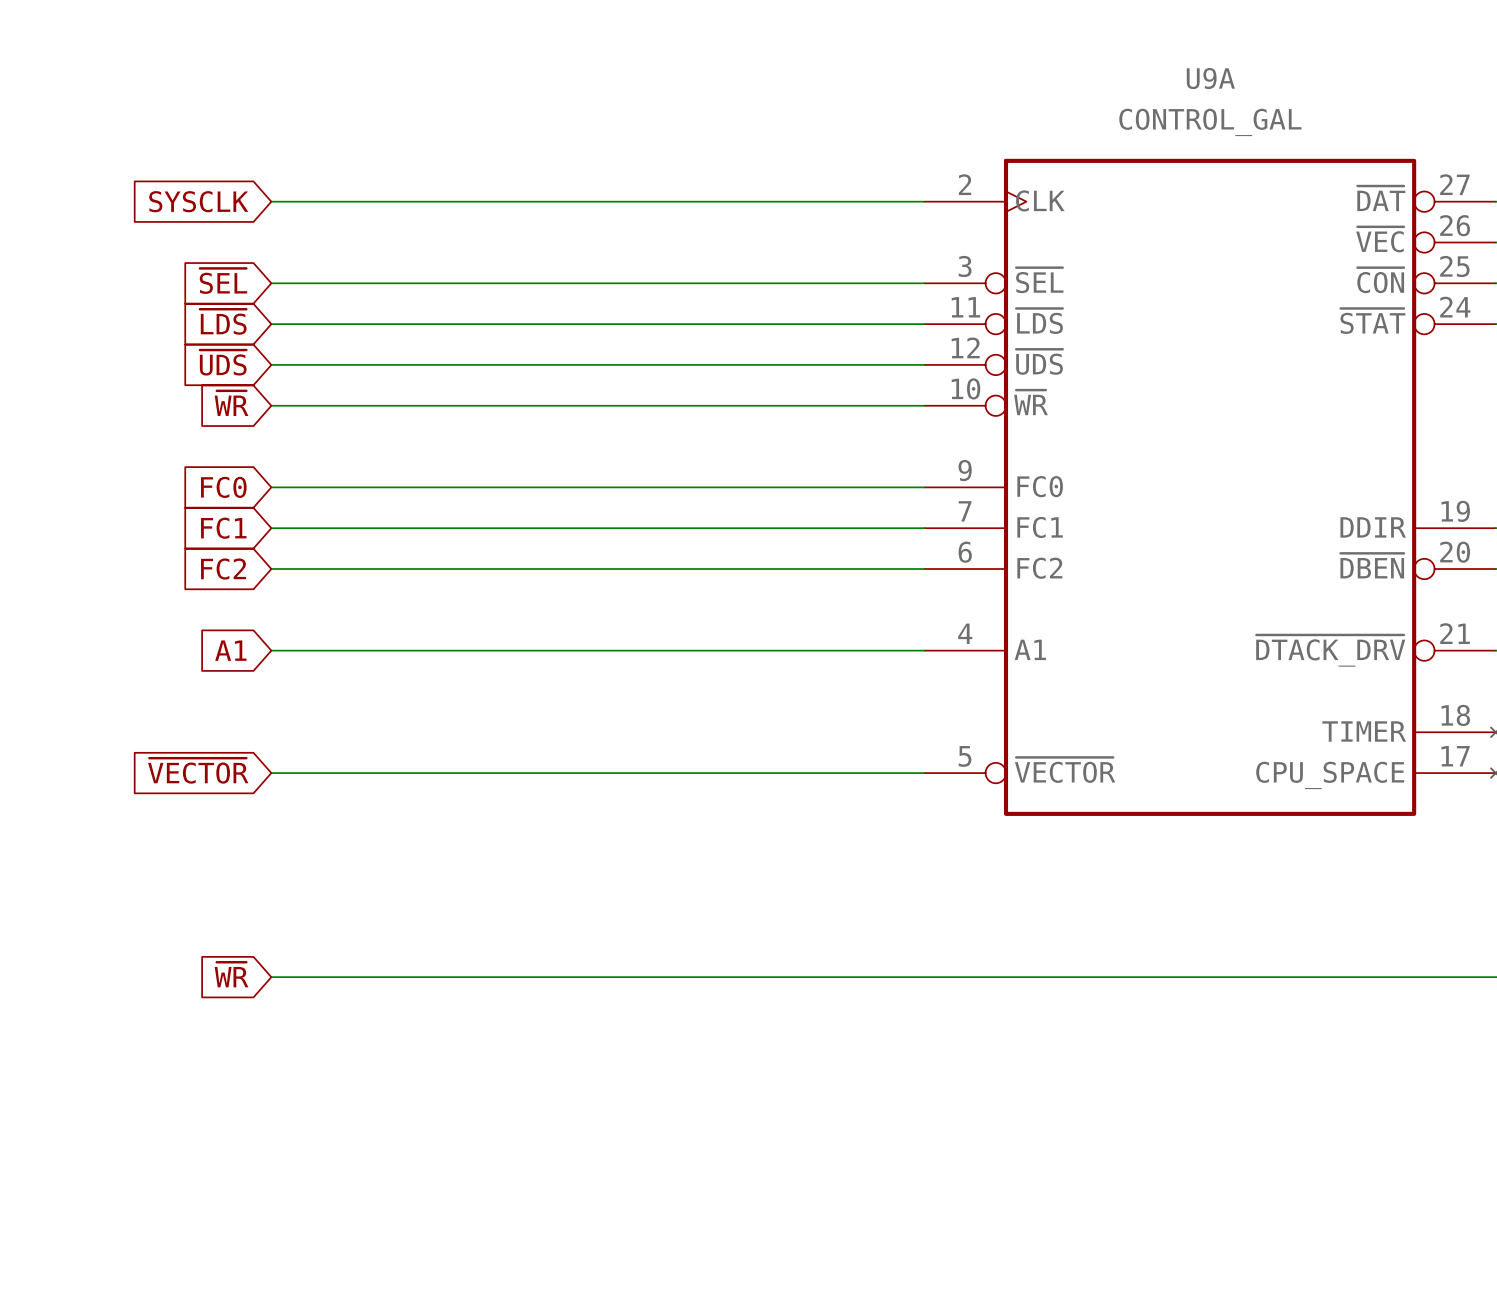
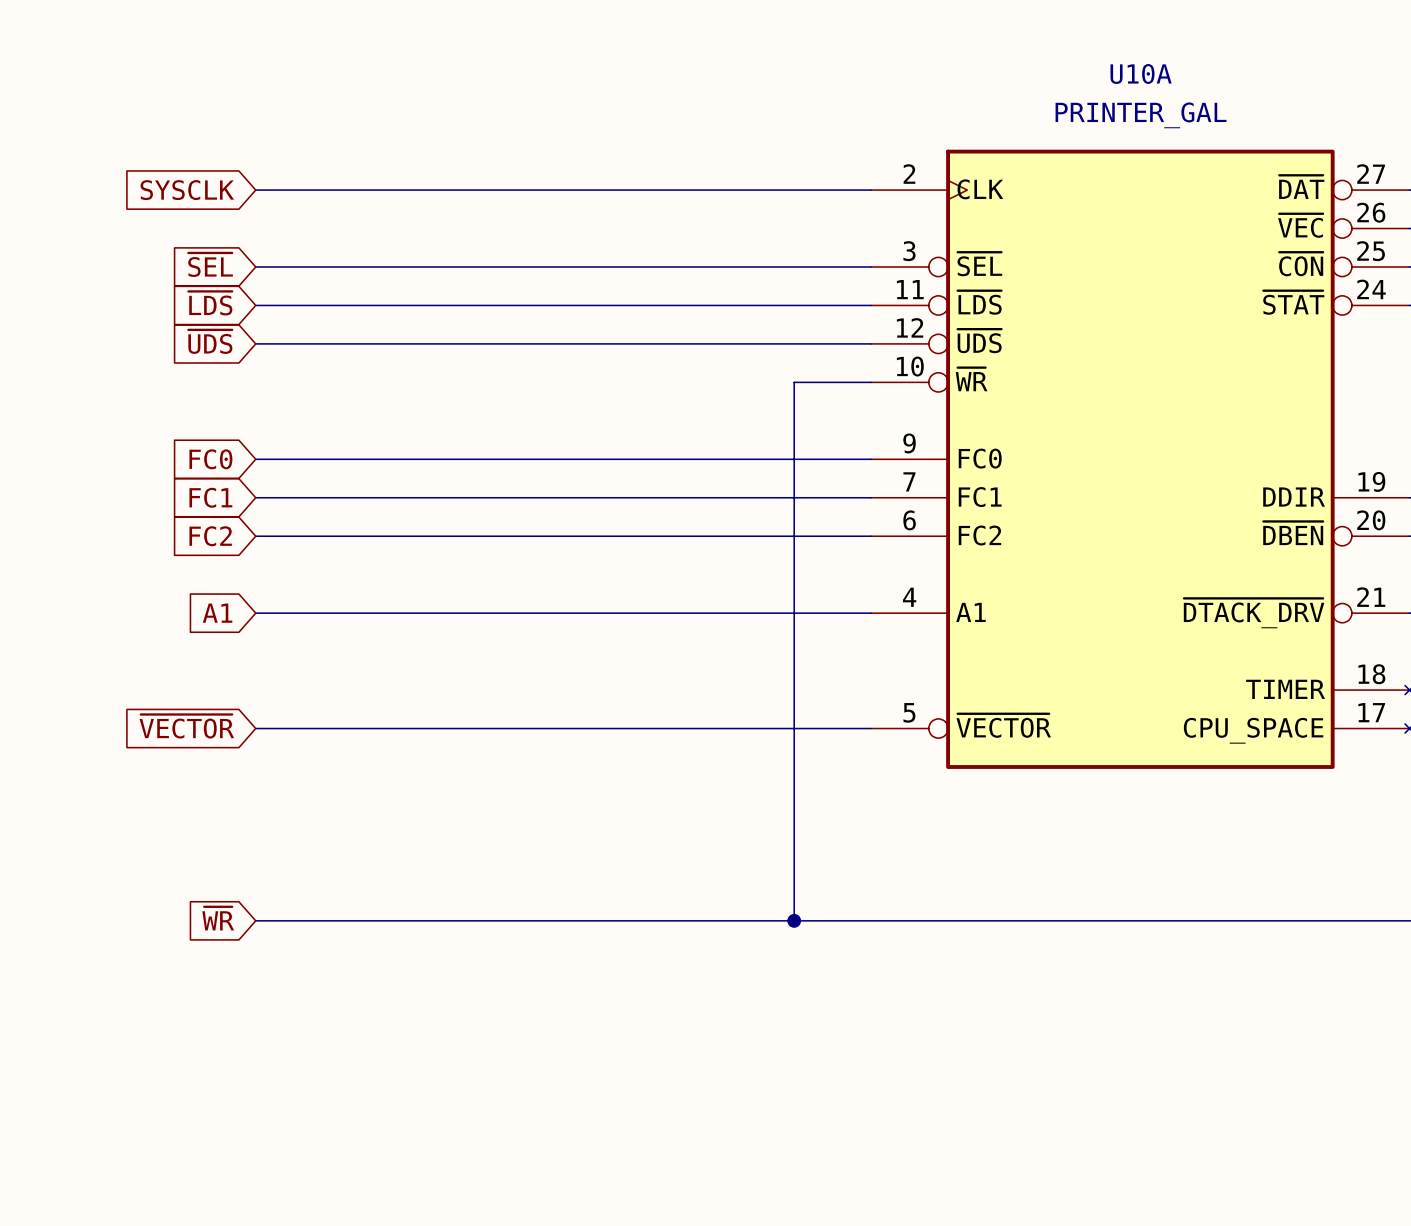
U9A name: U9A (1210, 78) -> U10A (1141, 73)
U9A value: CONTROL_GAL (1210, 122) -> PRINTER_GAL (1141, 115)
global label: ~{WR} (231, 403) -> none
wire: (271, 405) (842, 405) -> (794, 920) (794, 382)
junction: none -> (794, 920)

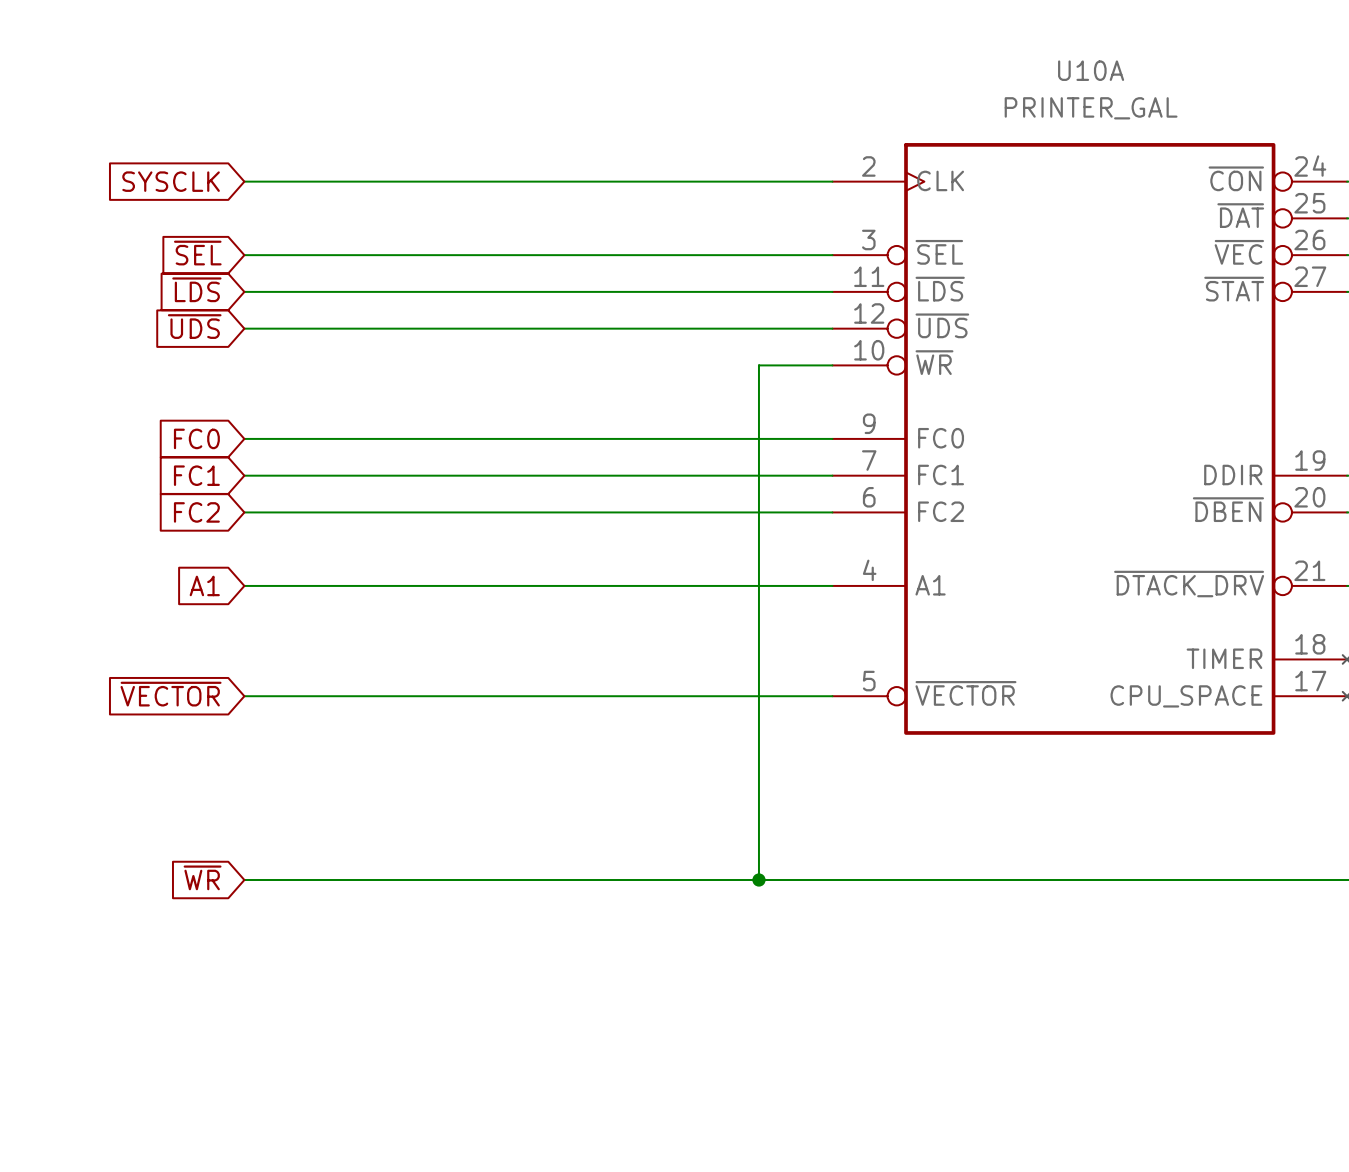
U10A pin number: 27 (1371, 174) -> 24 (1310, 166)
U10A pin name: ~{DAT} (1301, 187) -> ~{CON} (1236, 178)
U10A pin number: 26 (1371, 212) -> 25 (1309, 203)
U10A pin name: ~{VEC} (1300, 225) -> ~{DAT} (1240, 215)
U10A pin number: 25 (1371, 251) -> 26 (1309, 239)
U10A pin name: ~{CON} (1301, 264) -> ~{VEC} (1239, 252)
U10A pin number: 24 (1371, 289) -> 27 (1310, 276)

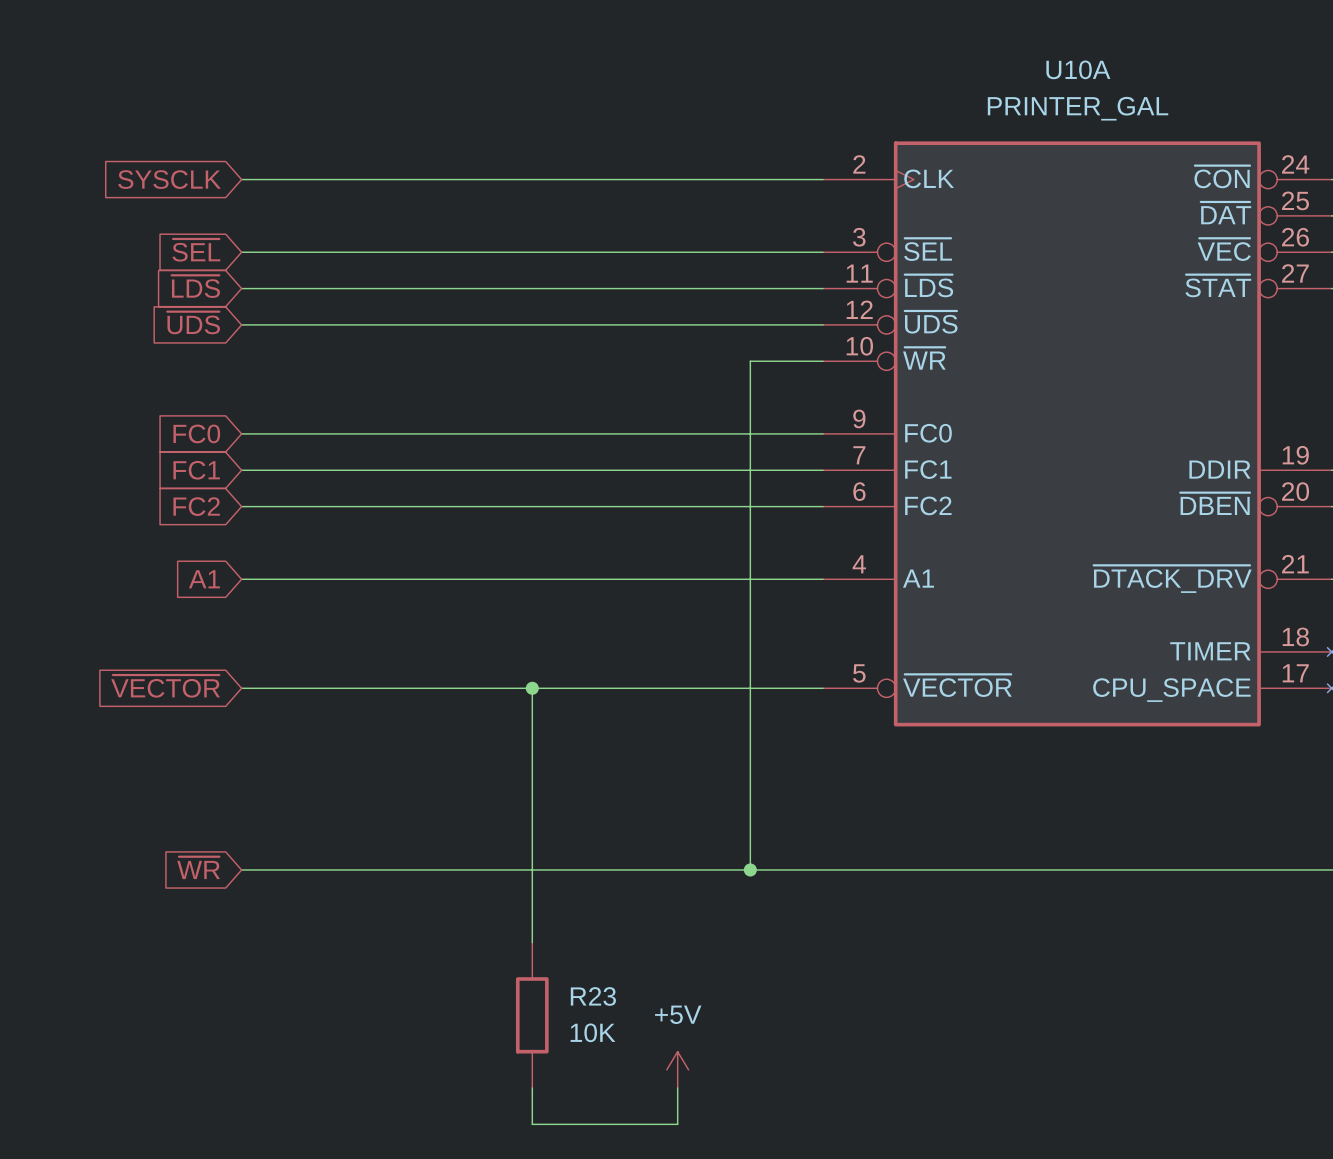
wire: none -> (532, 688) (532, 942)
junction: none -> (532, 688)
R23: none -> 10K (532, 1015)
power symbol: none -> +5V (677, 1069)
wire: none -> (532, 1088) (532, 1124) (677, 1124) (677, 1088)

